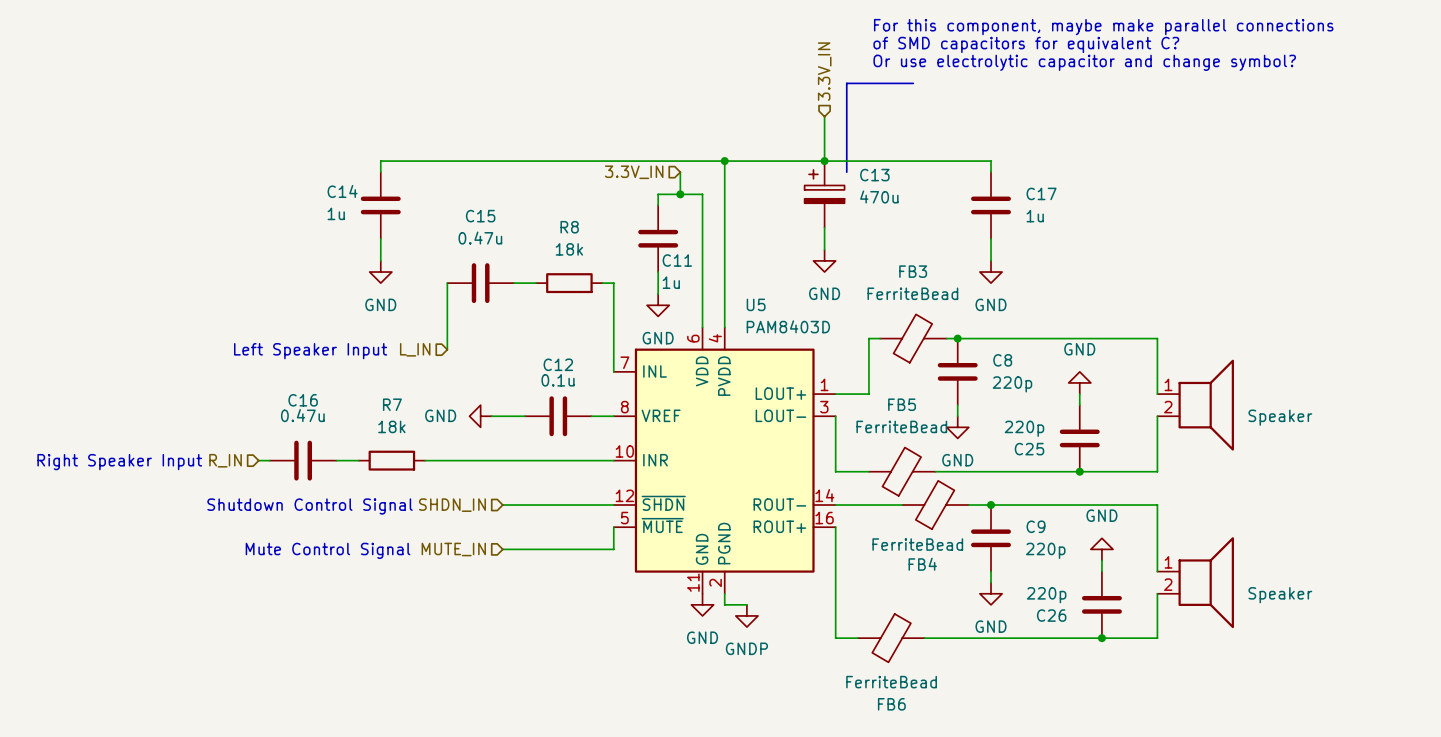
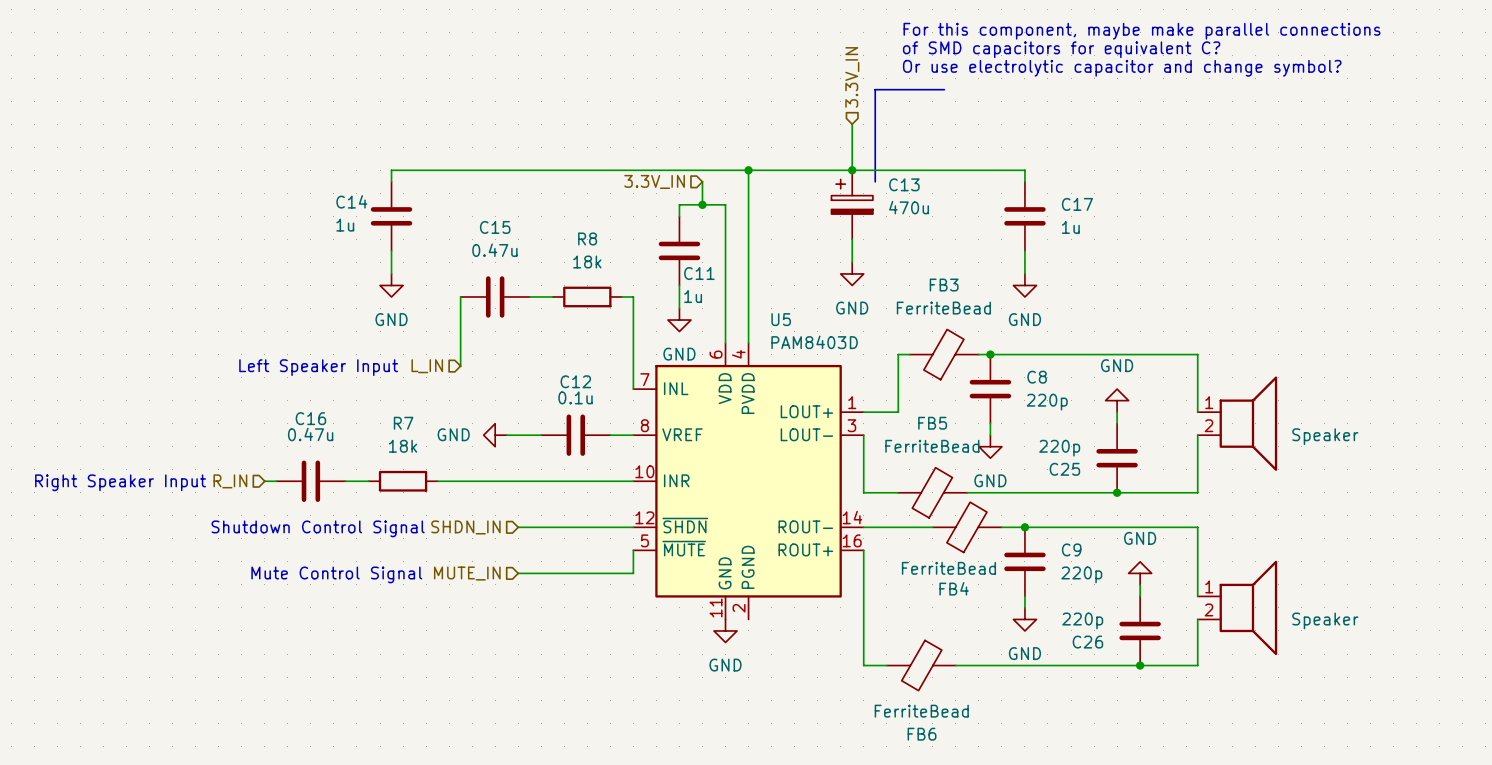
wire: (724, 593) (724, 604) (746, 604) -> none
power symbol: GNDP (746, 615) -> none

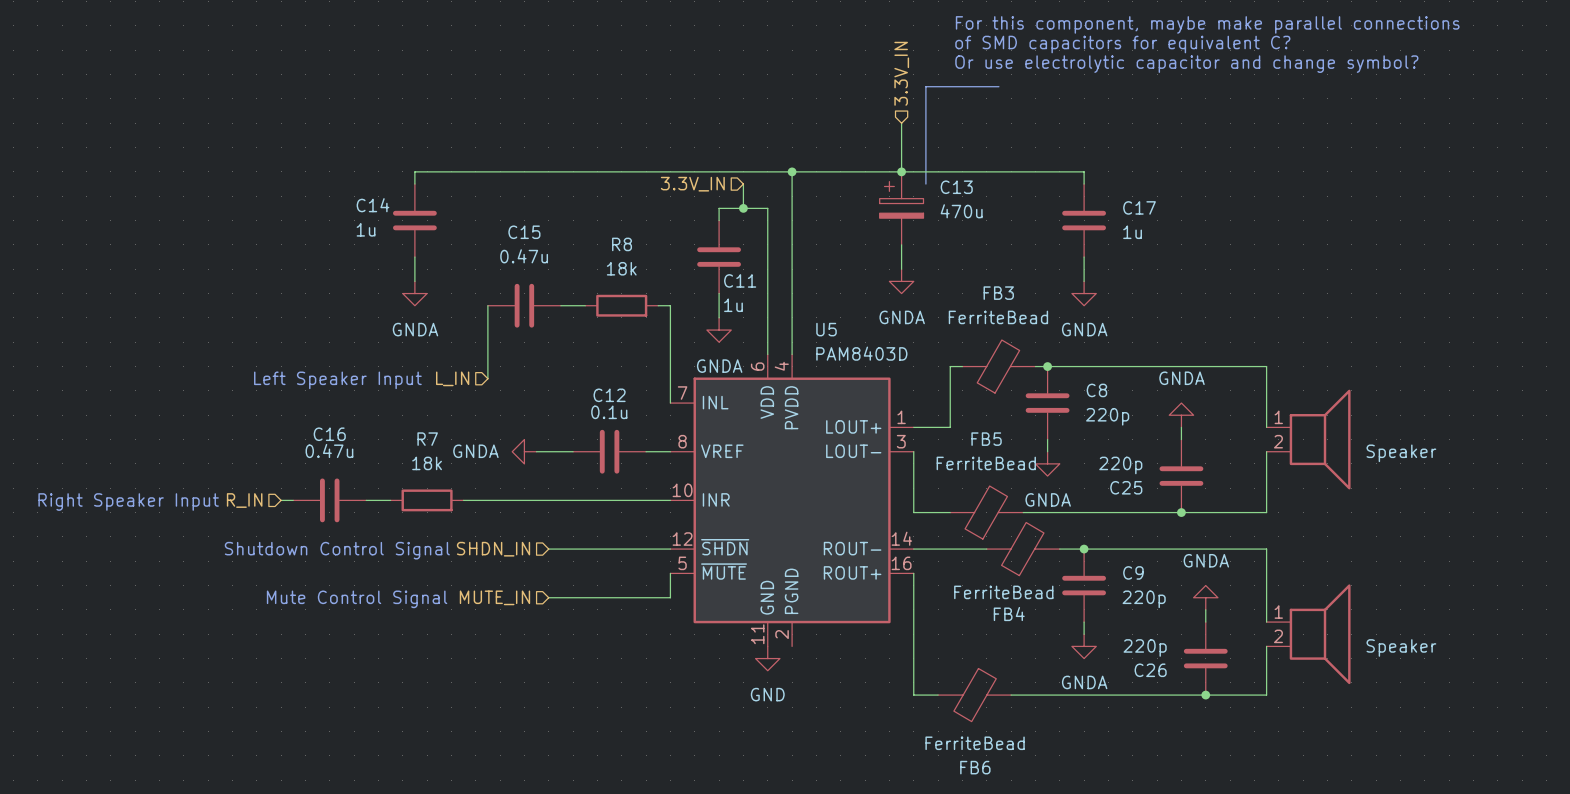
power symbol: GND (852, 273) -> GNDA (901, 281)
power symbol: GND (391, 285) -> GNDA (414, 293)
power symbol: GND (1024, 285) -> GNDA (1084, 293)
power symbol: GND (679, 320) -> GNDA (719, 330)
power symbol: GND (1117, 400) -> GNDA (1181, 415)
power symbol: GND (495, 435) -> GNDA (524, 451)
power symbol: GND (990, 446) -> GNDA (1047, 463)
power symbol: GND (1140, 573) -> GNDA (1205, 597)
power symbol: GND (1024, 619) -> GNDA (1084, 646)

